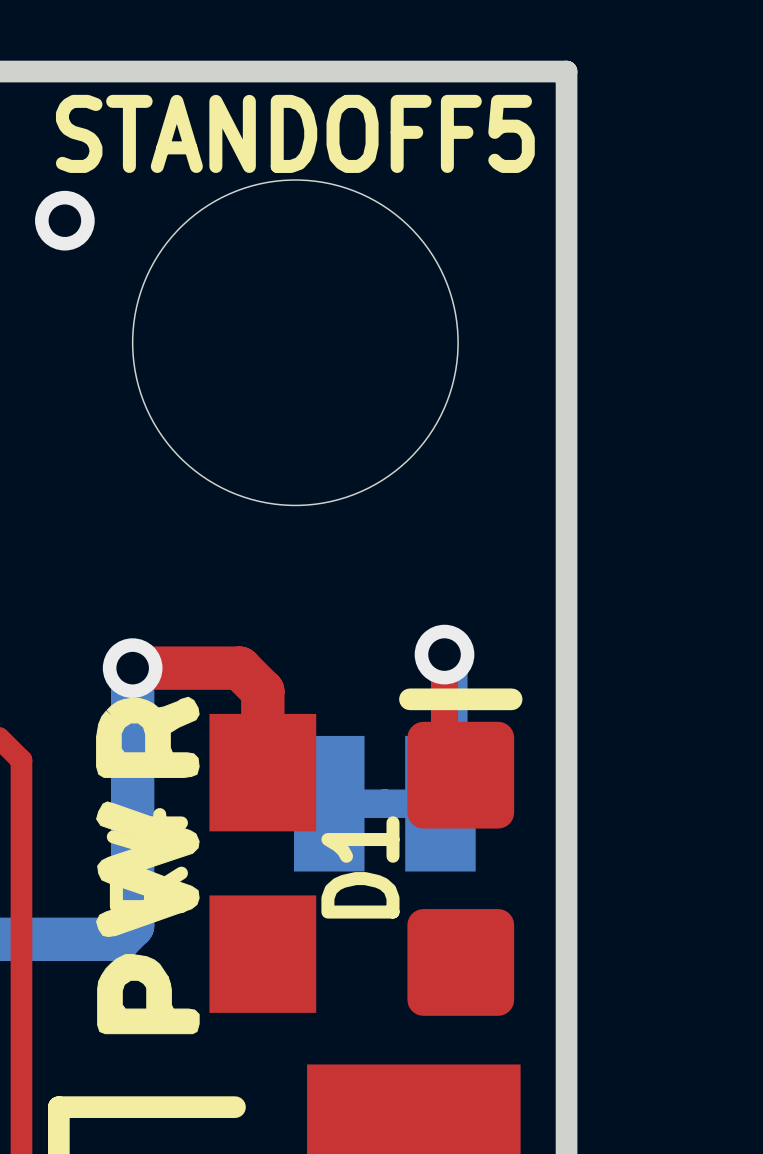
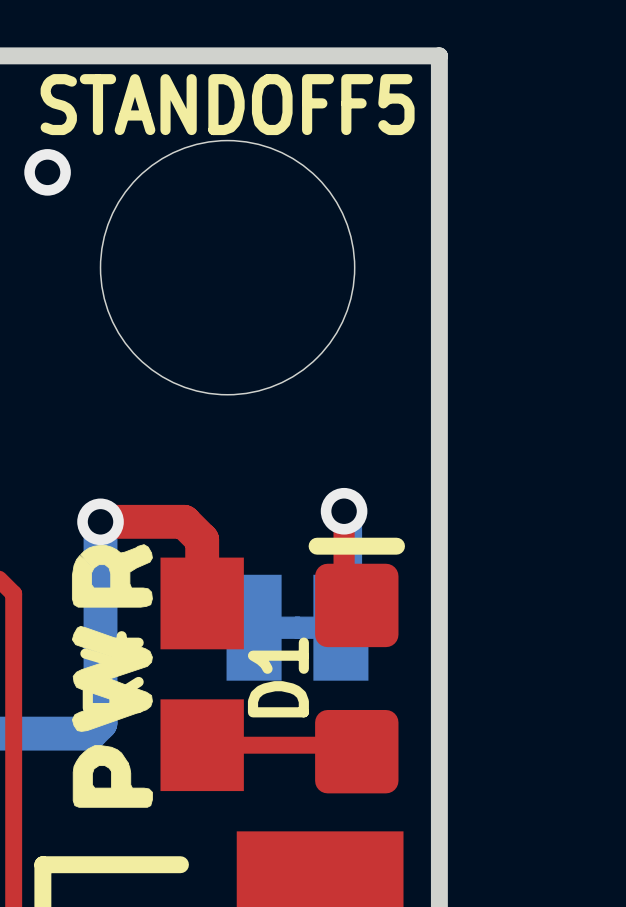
top track: none -> (202, 745) (350, 745)

